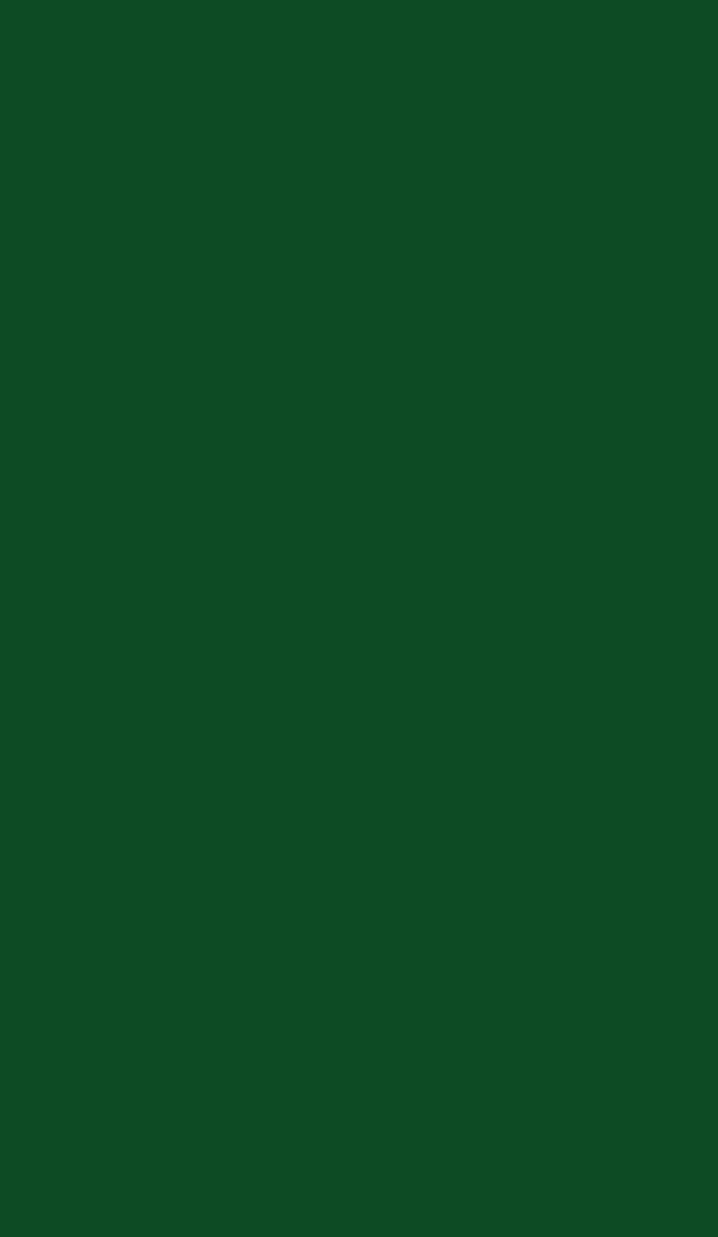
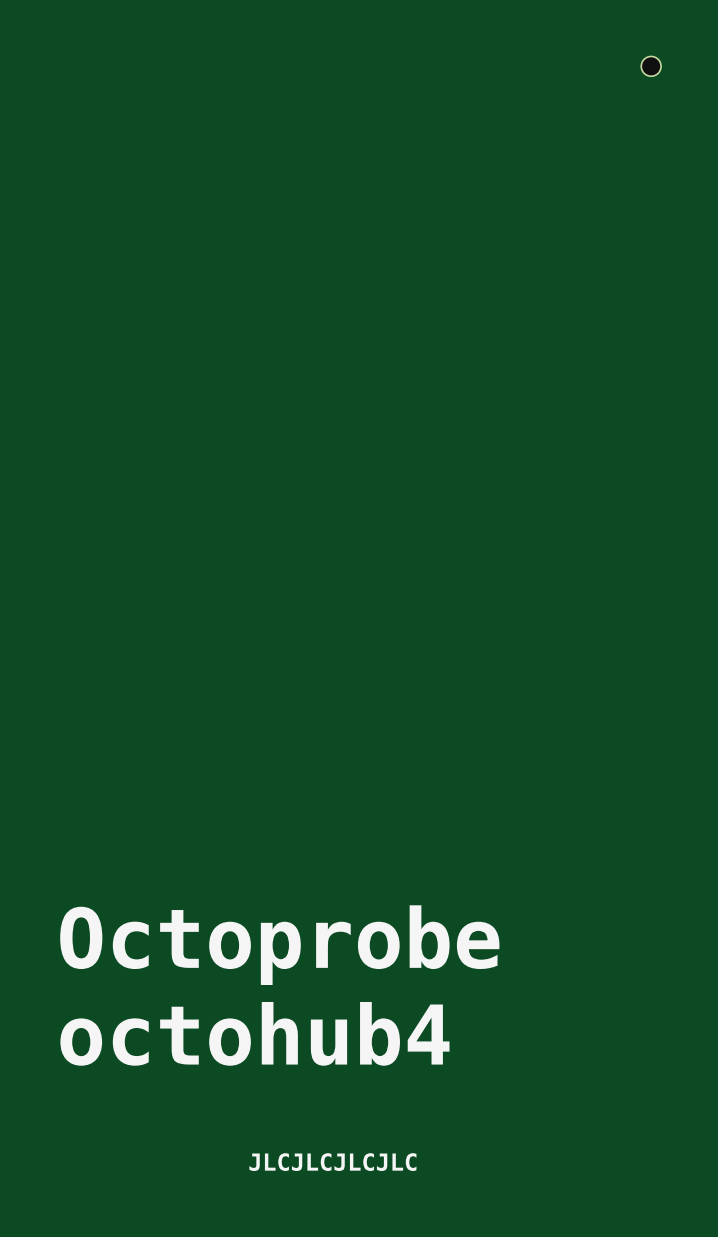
part: none -> (651, 66)
text: none -> Octoprobe (279, 945)
text: none -> octohub4 (254, 1033)
text: none -> JLCJLCJLCJLC (332, 1162)

